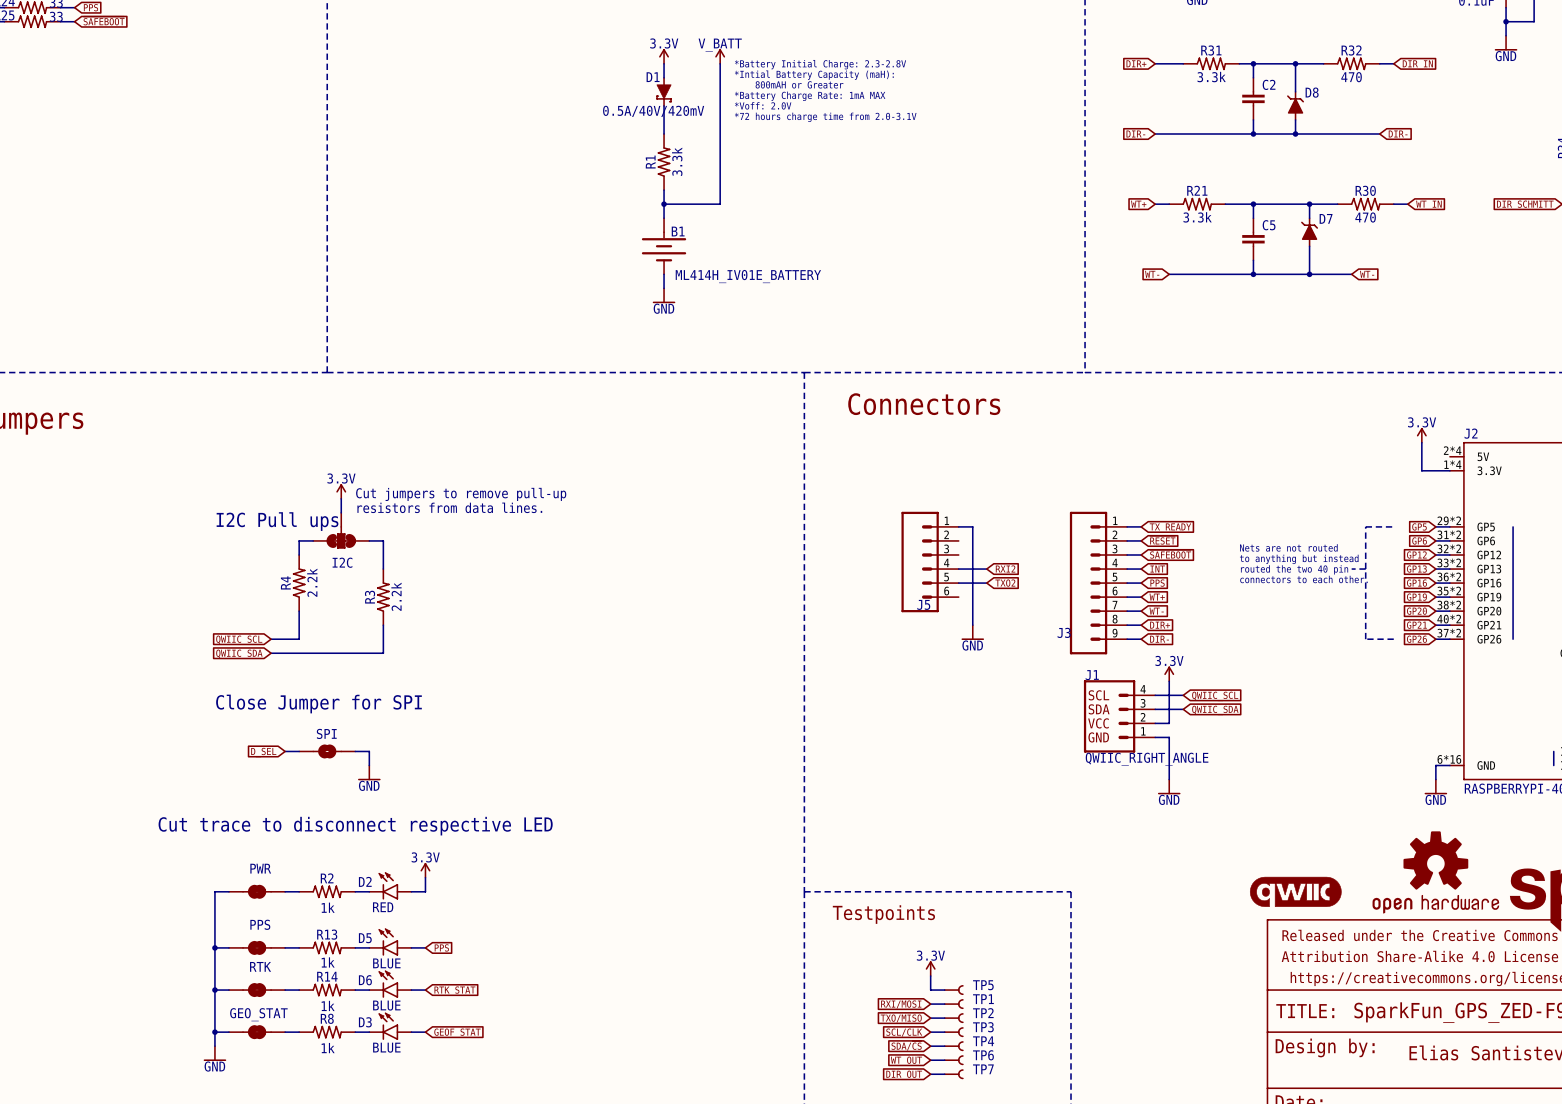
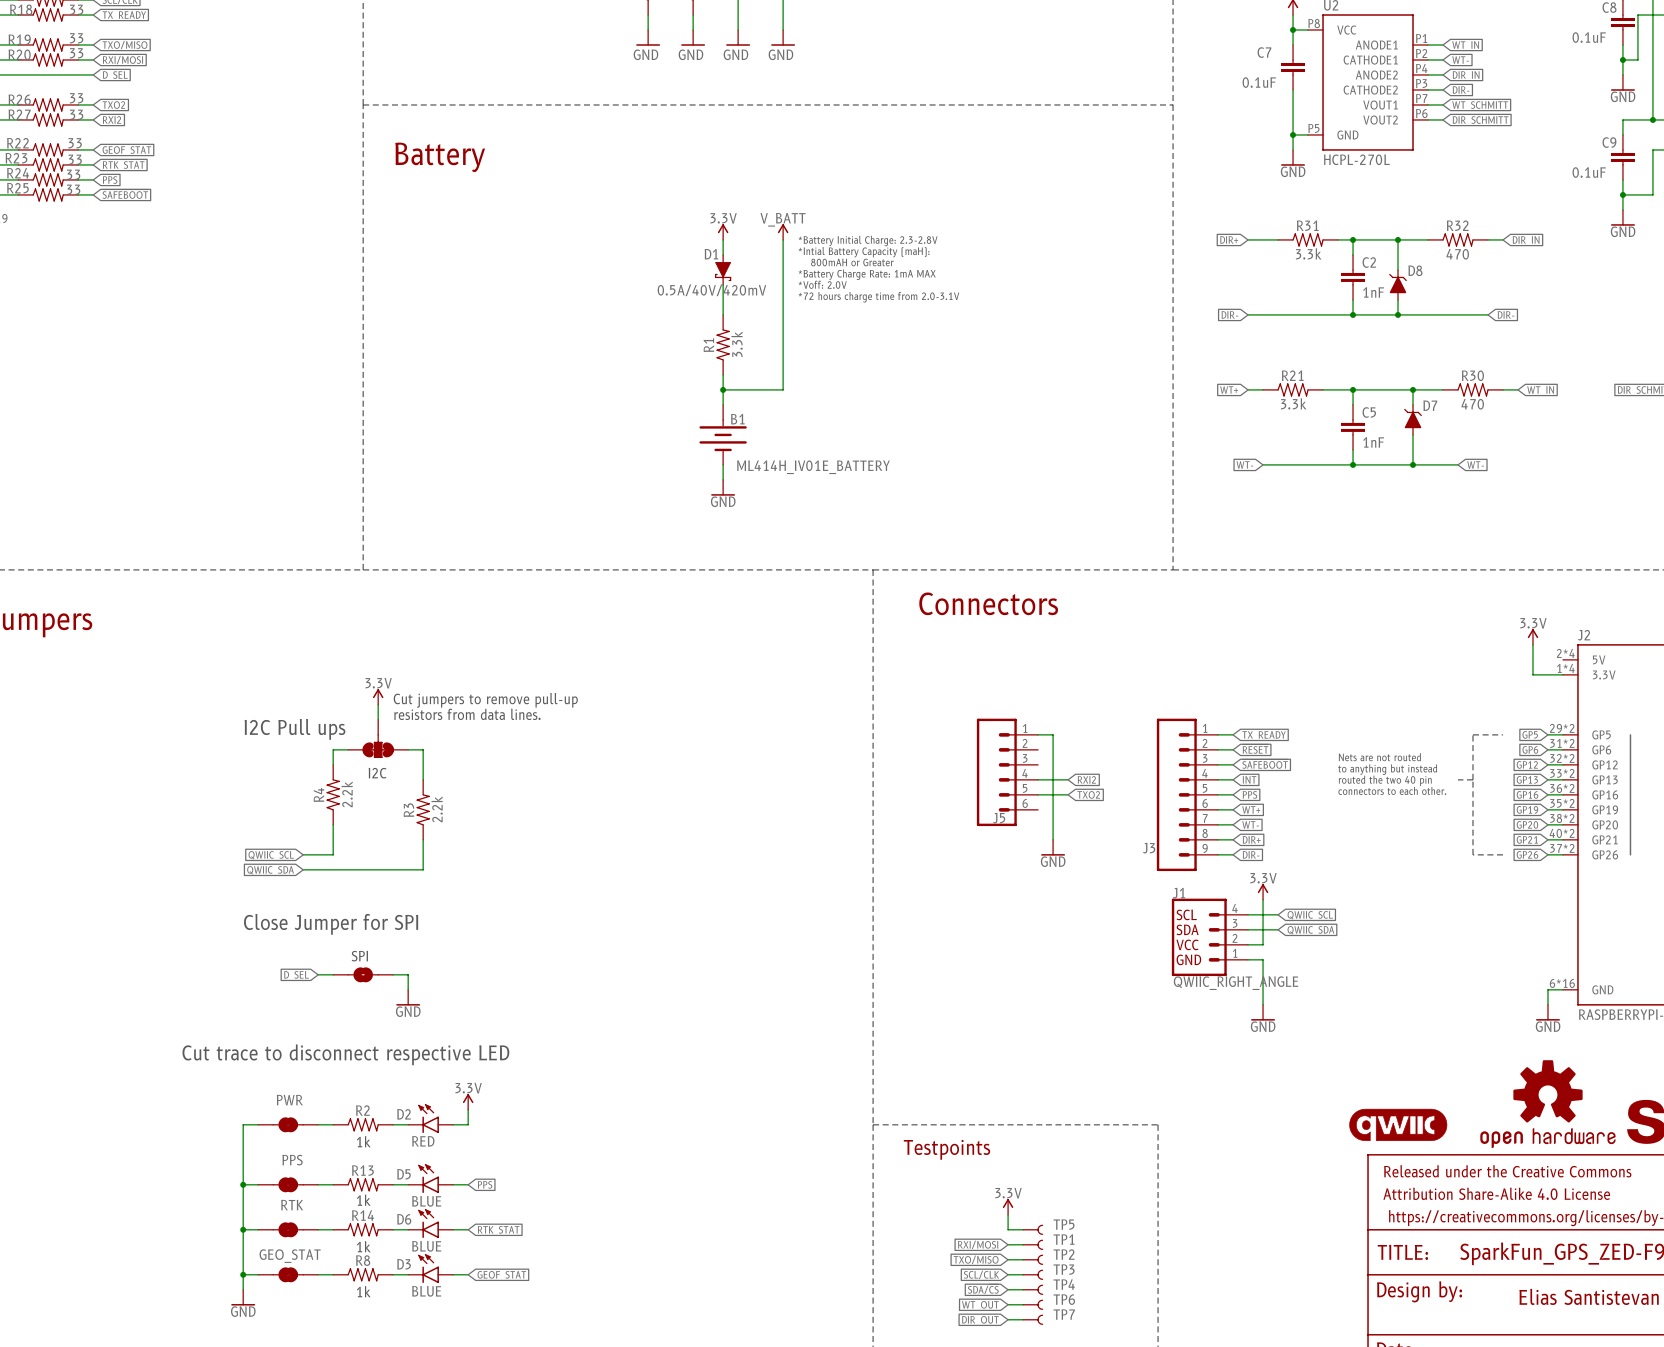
C2 value: none -> 1nF (1373, 292)
C5 value: none -> 1nF (1373, 442)

